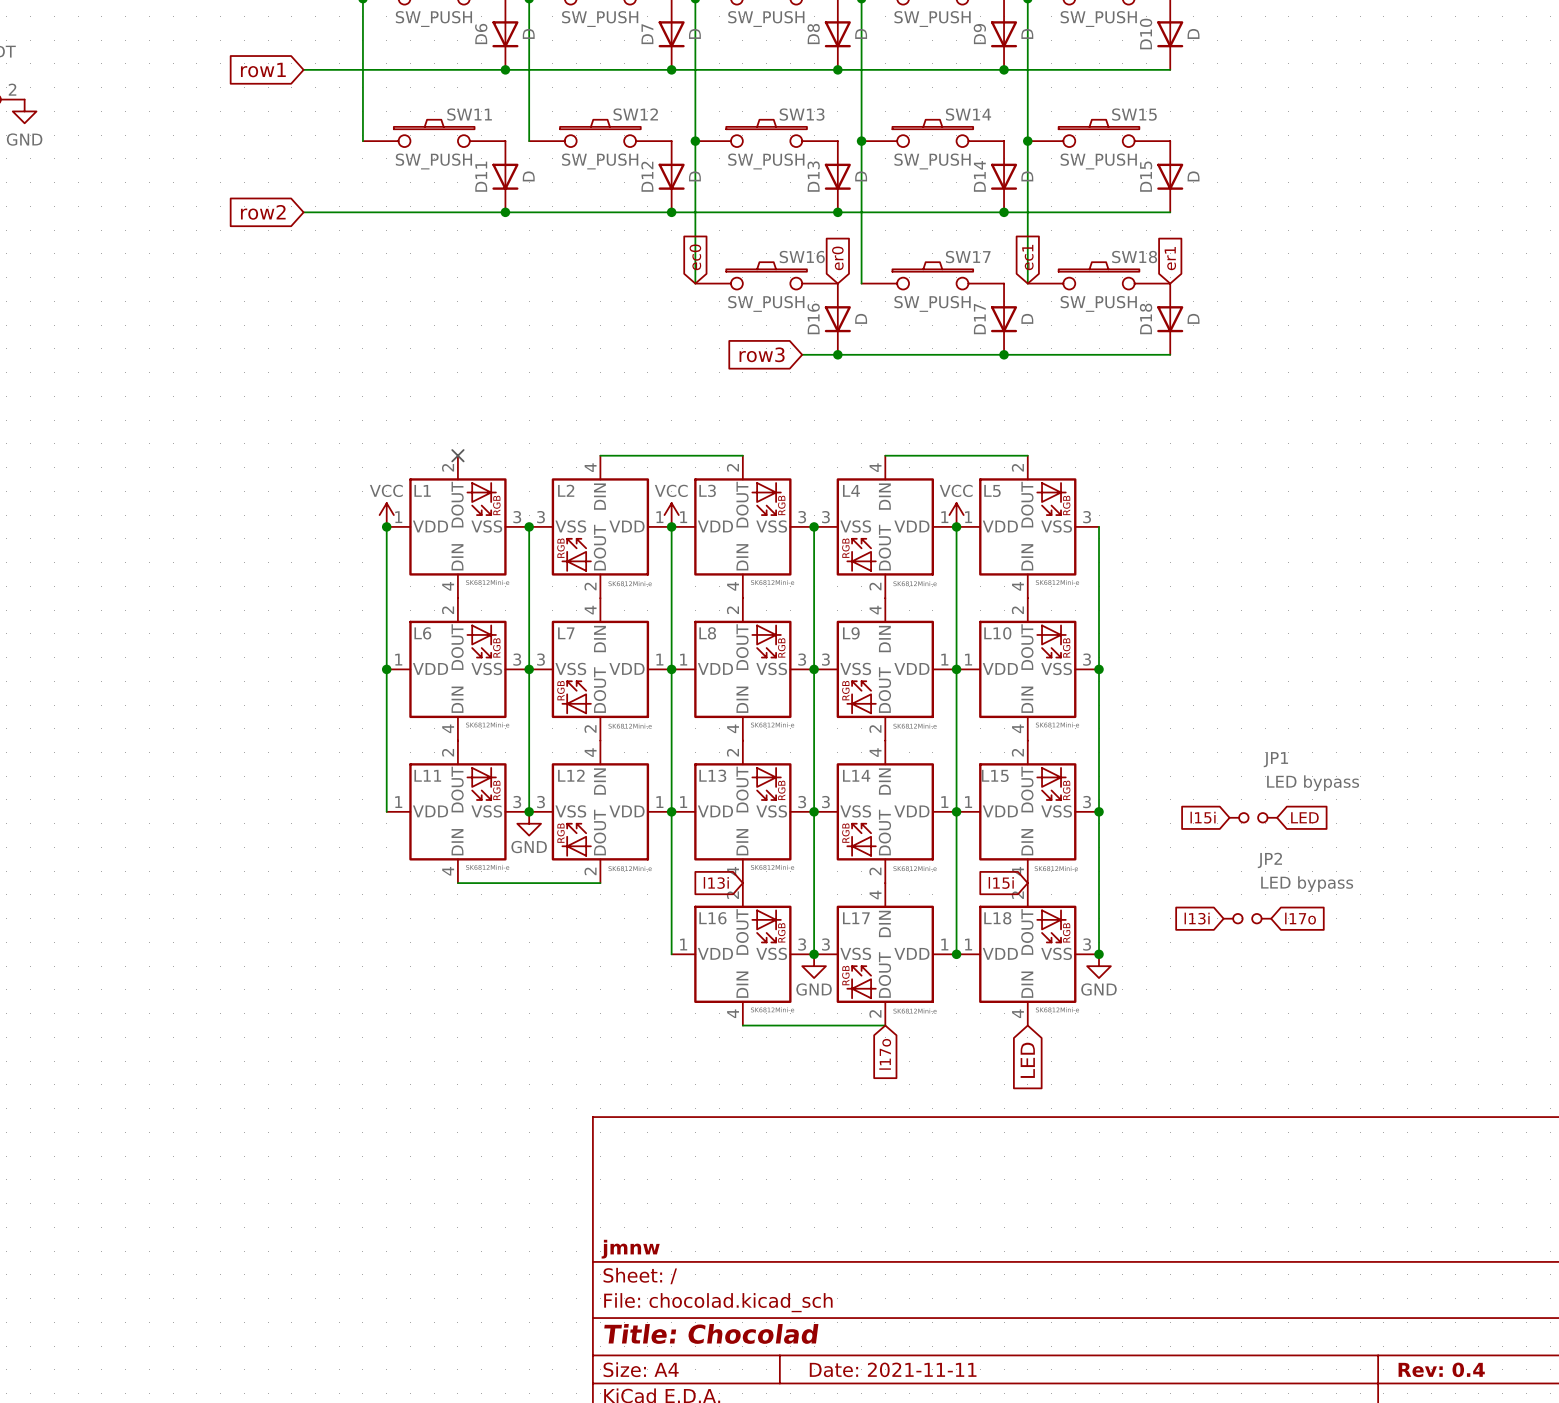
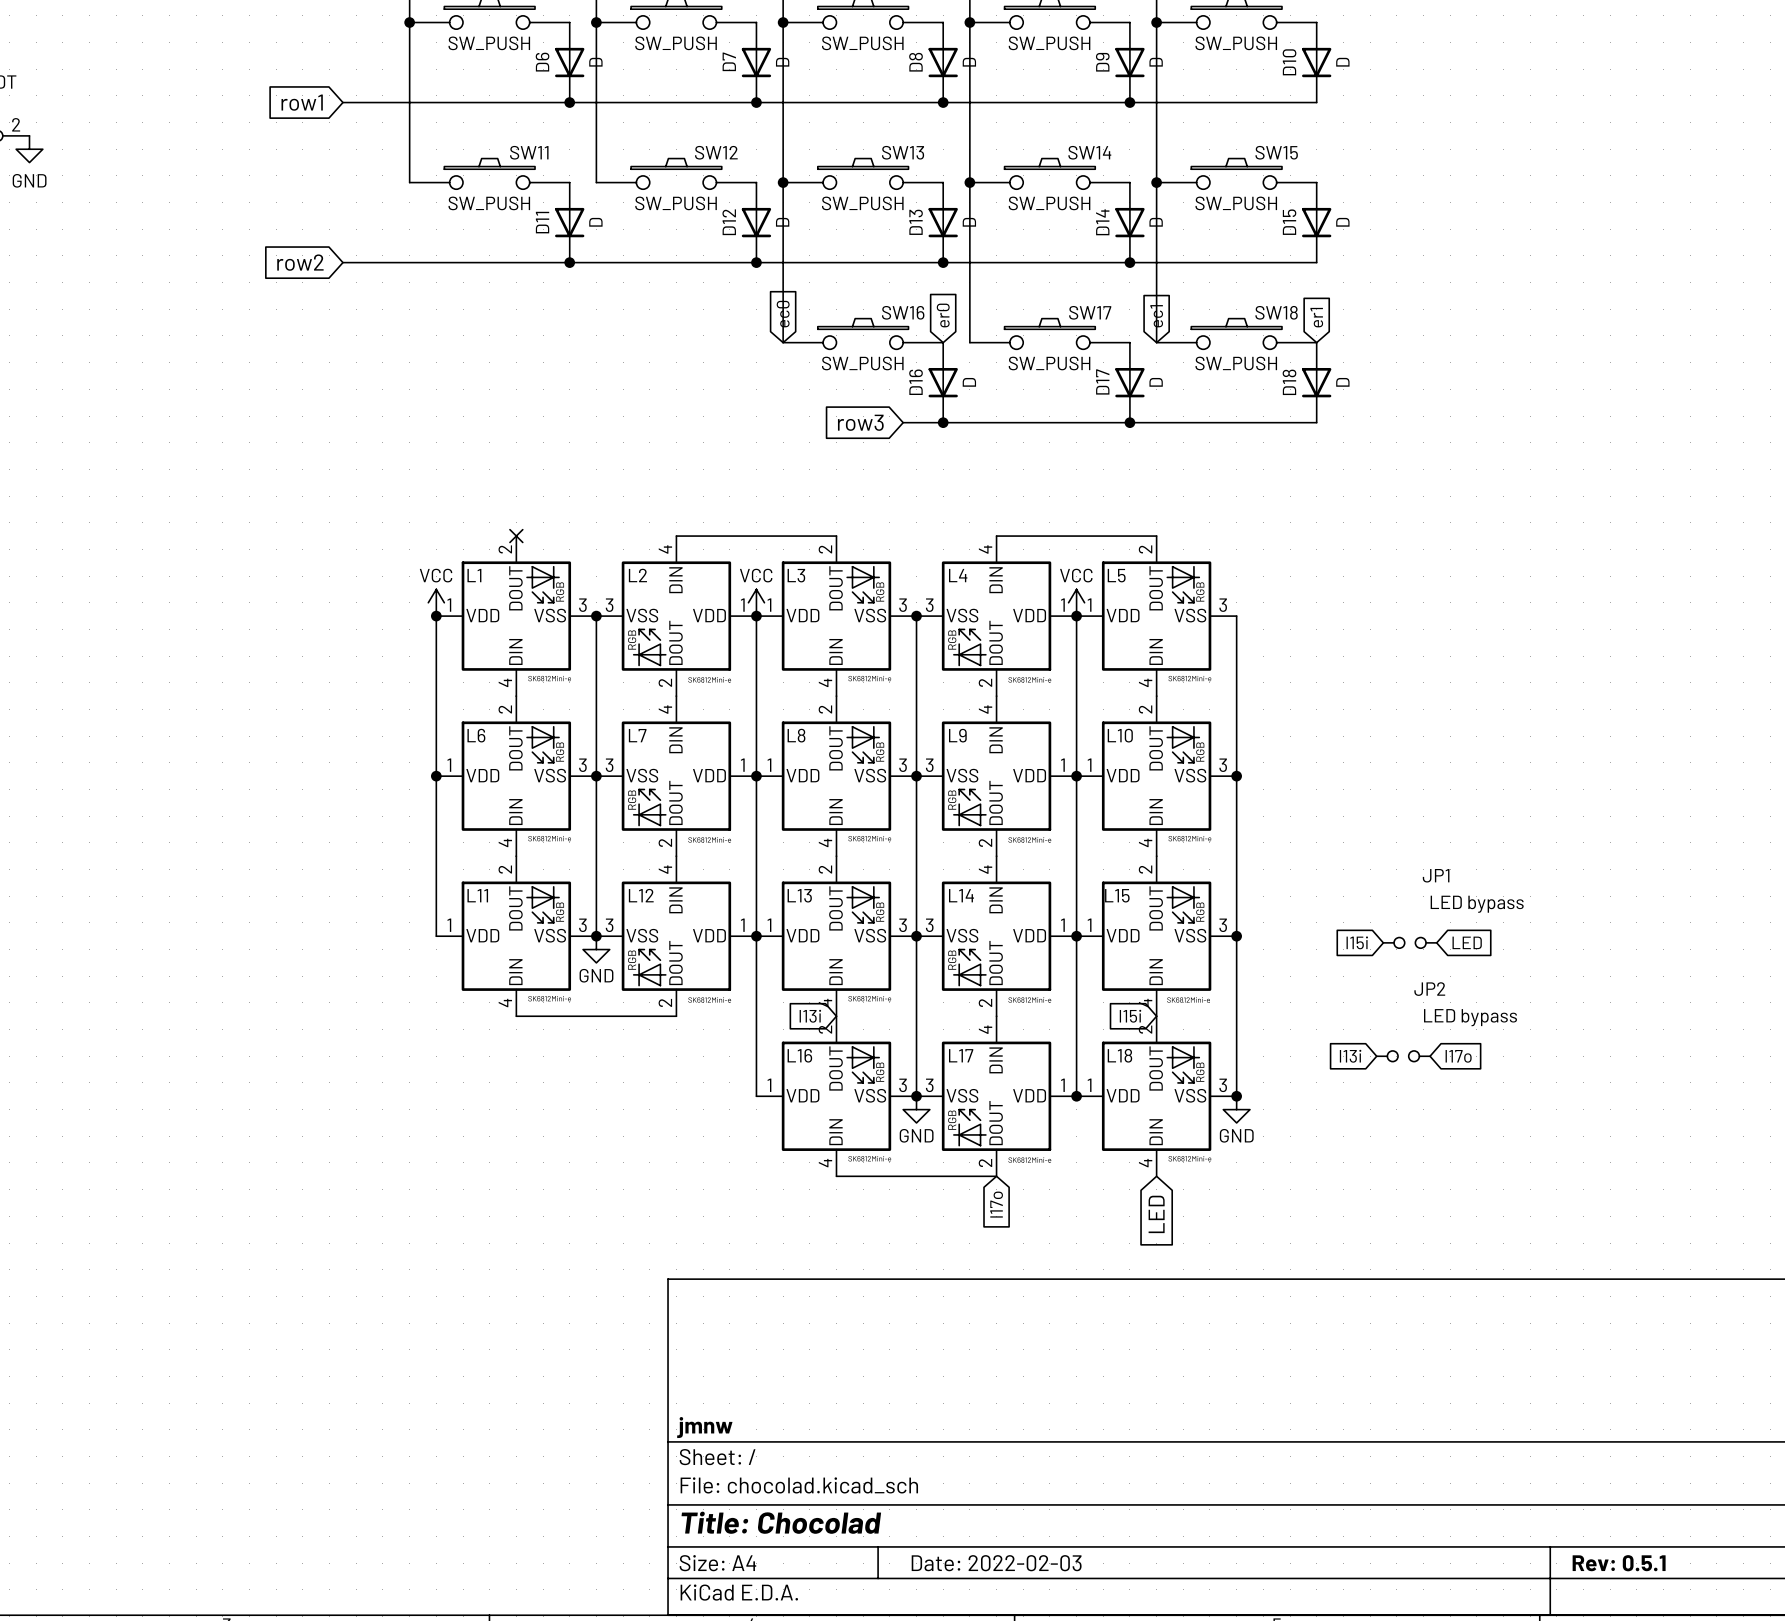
title block: Date: 2021-11-11 (893, 1369) -> Date: 2022-02-03 (996, 1563)
title block: Rev: 0.4 (1441, 1369) -> Rev: 0.5.1 (1619, 1563)

